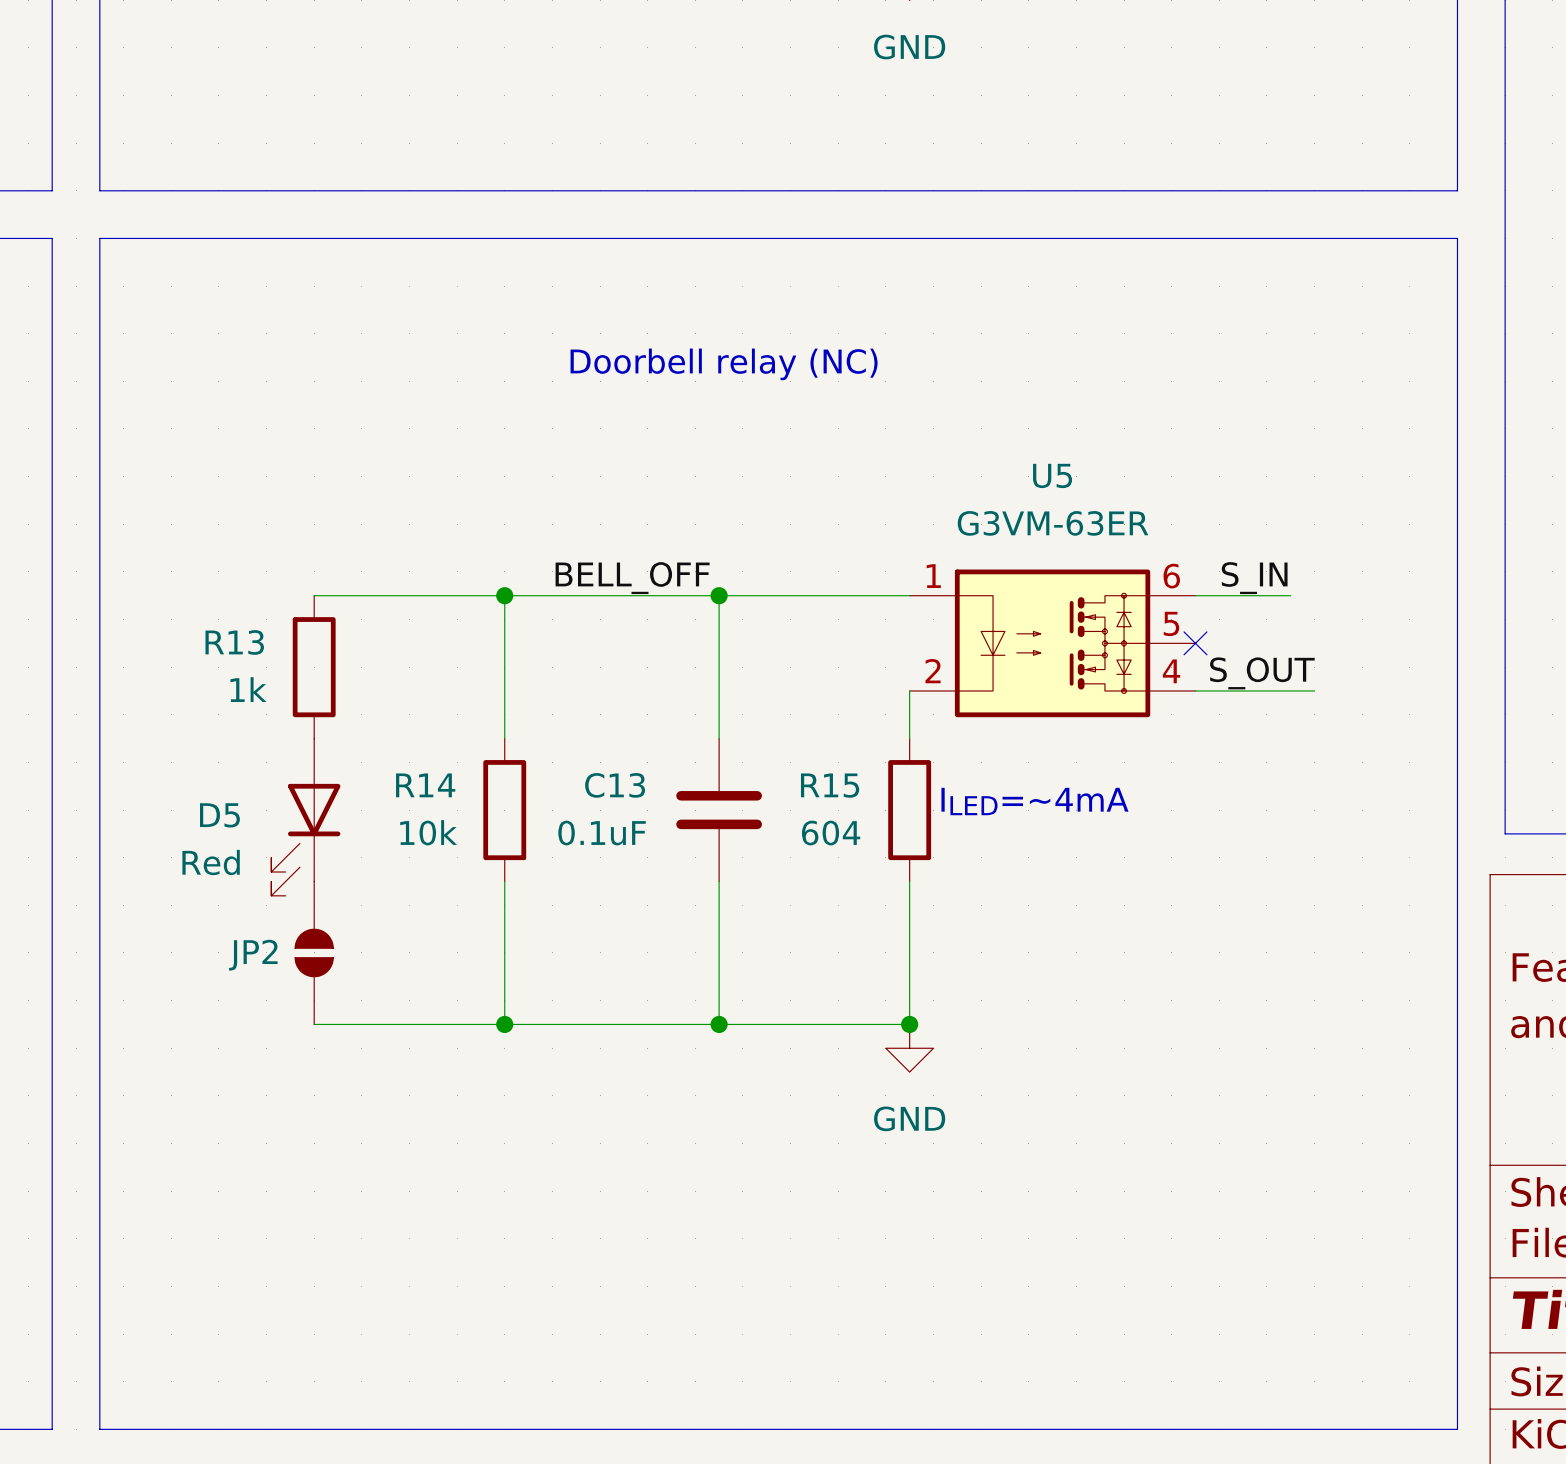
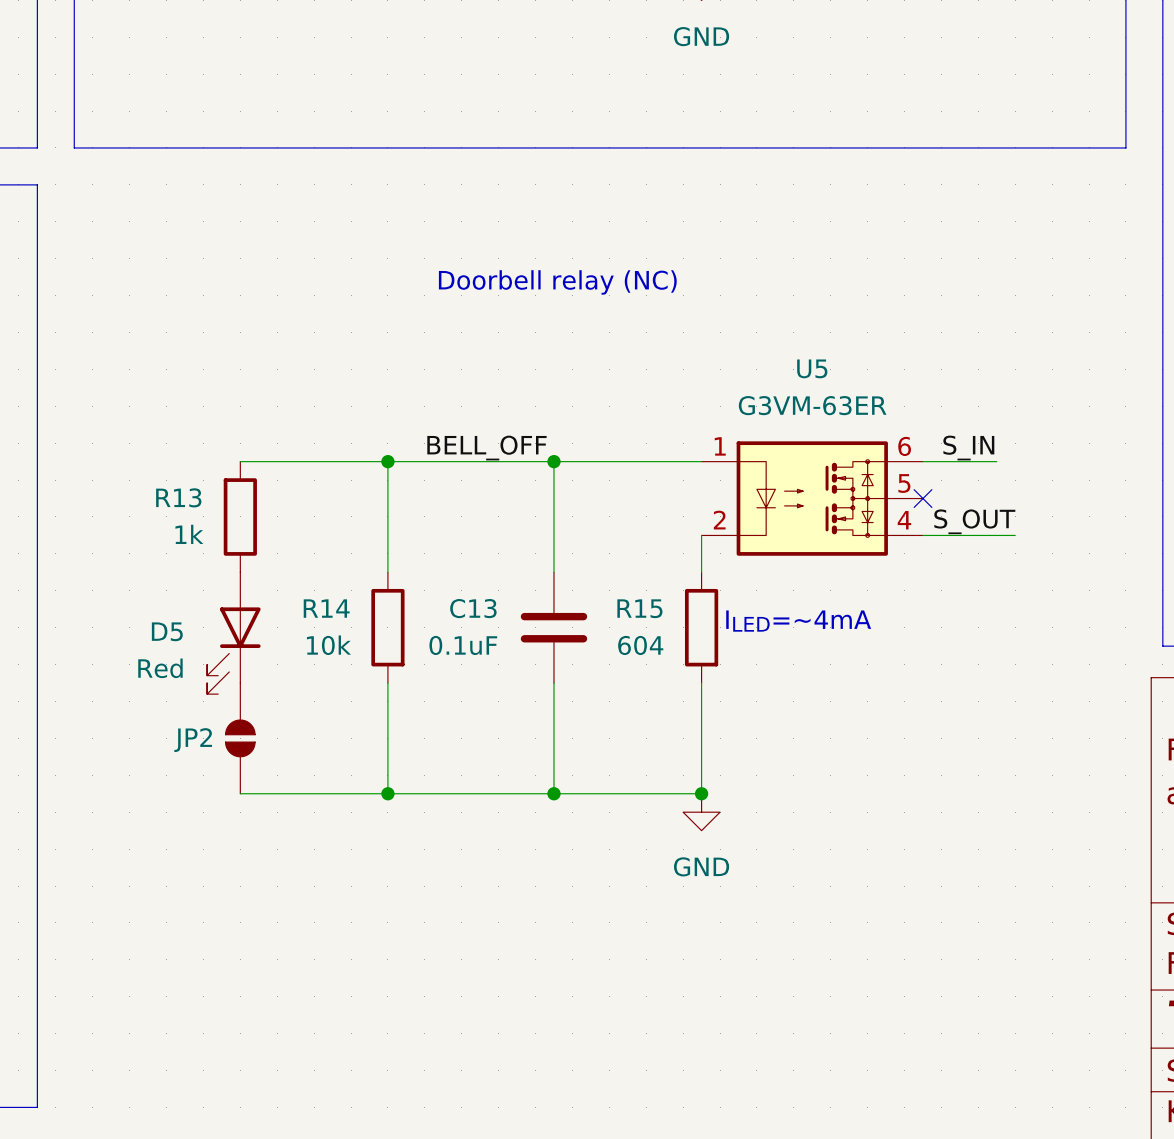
line: (99, 238) (99, 1429) (1457, 1429) (1457, 238) (99, 238) -> none

